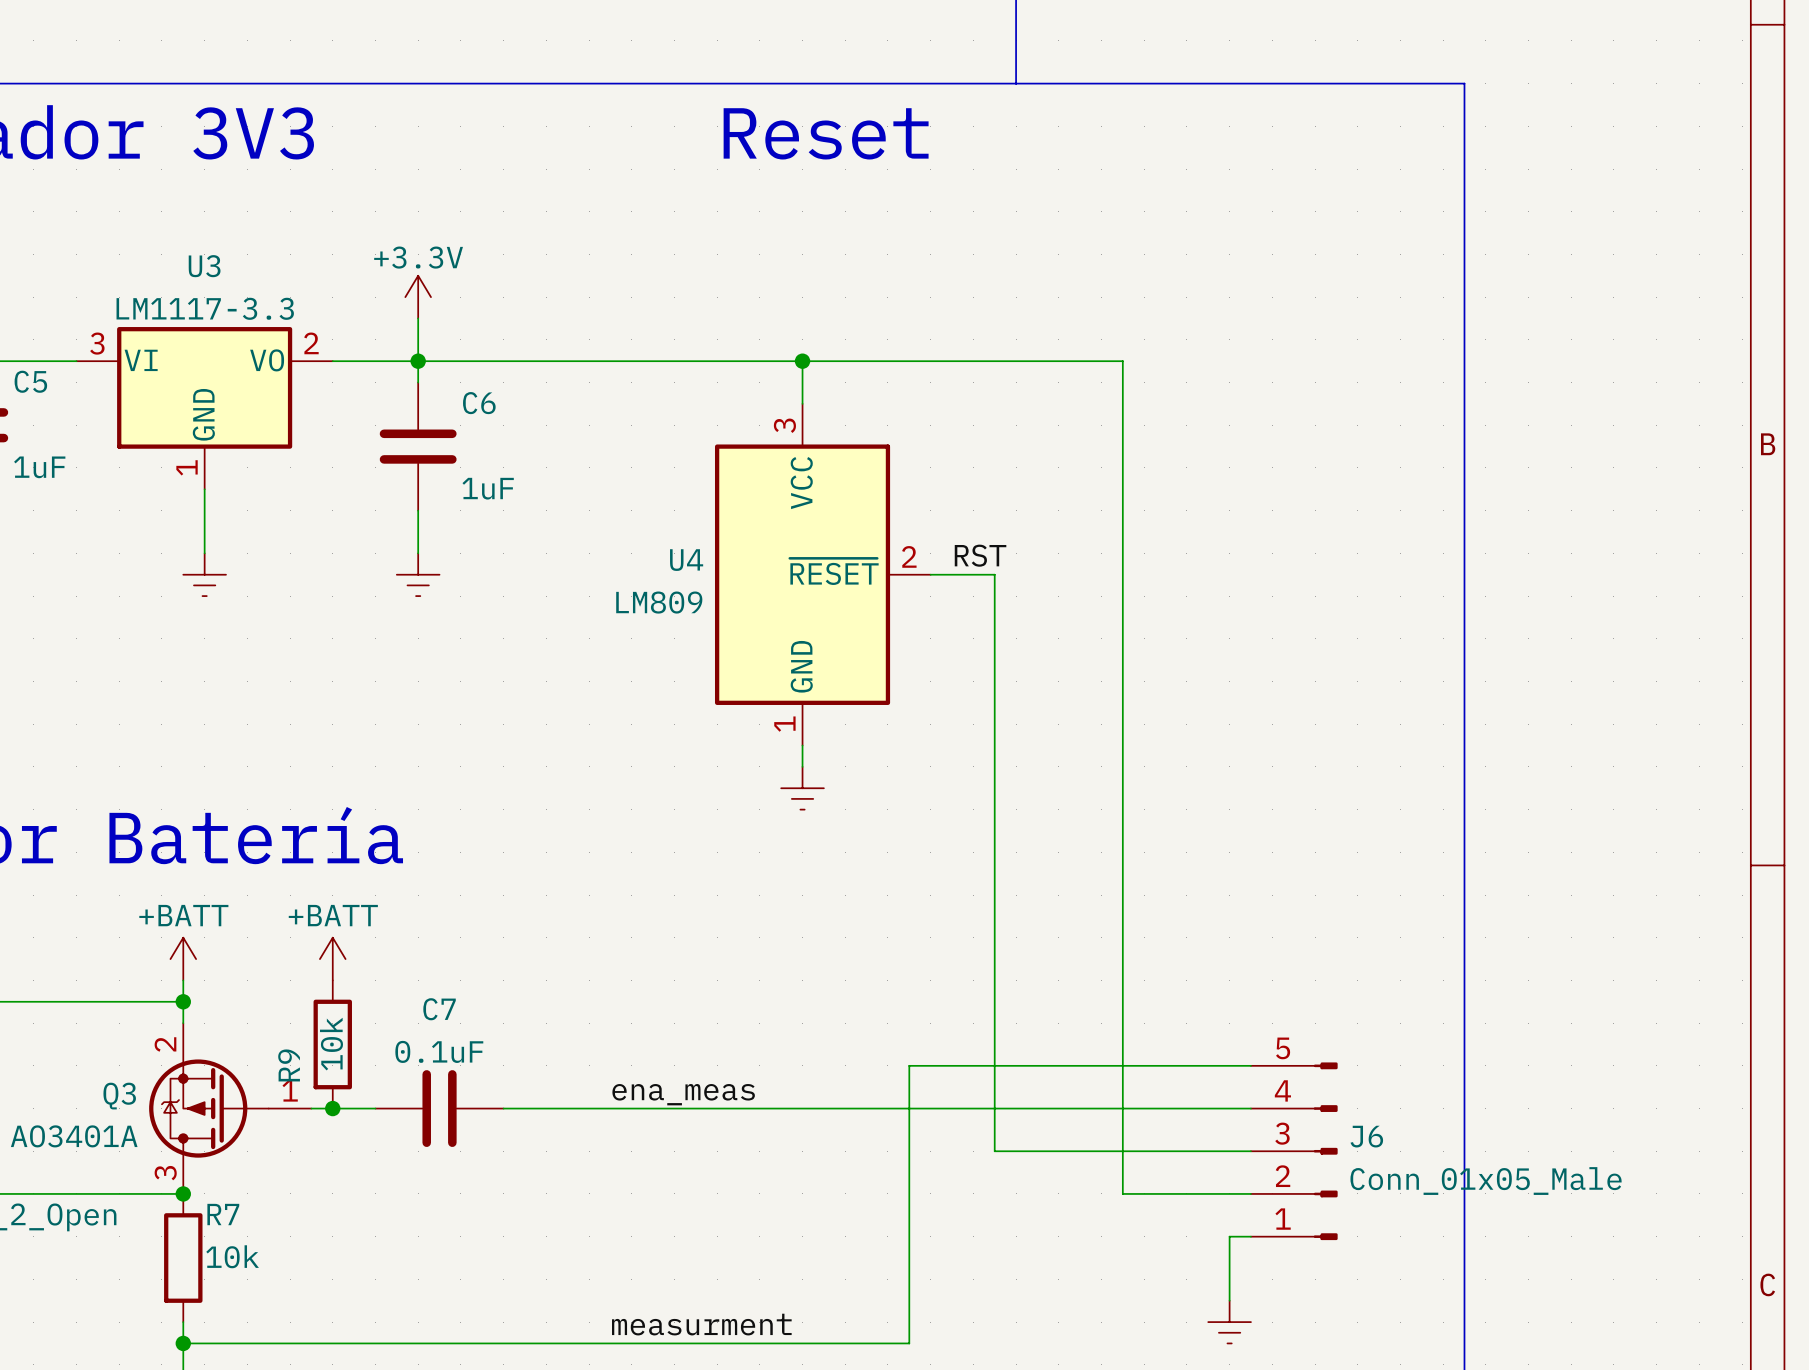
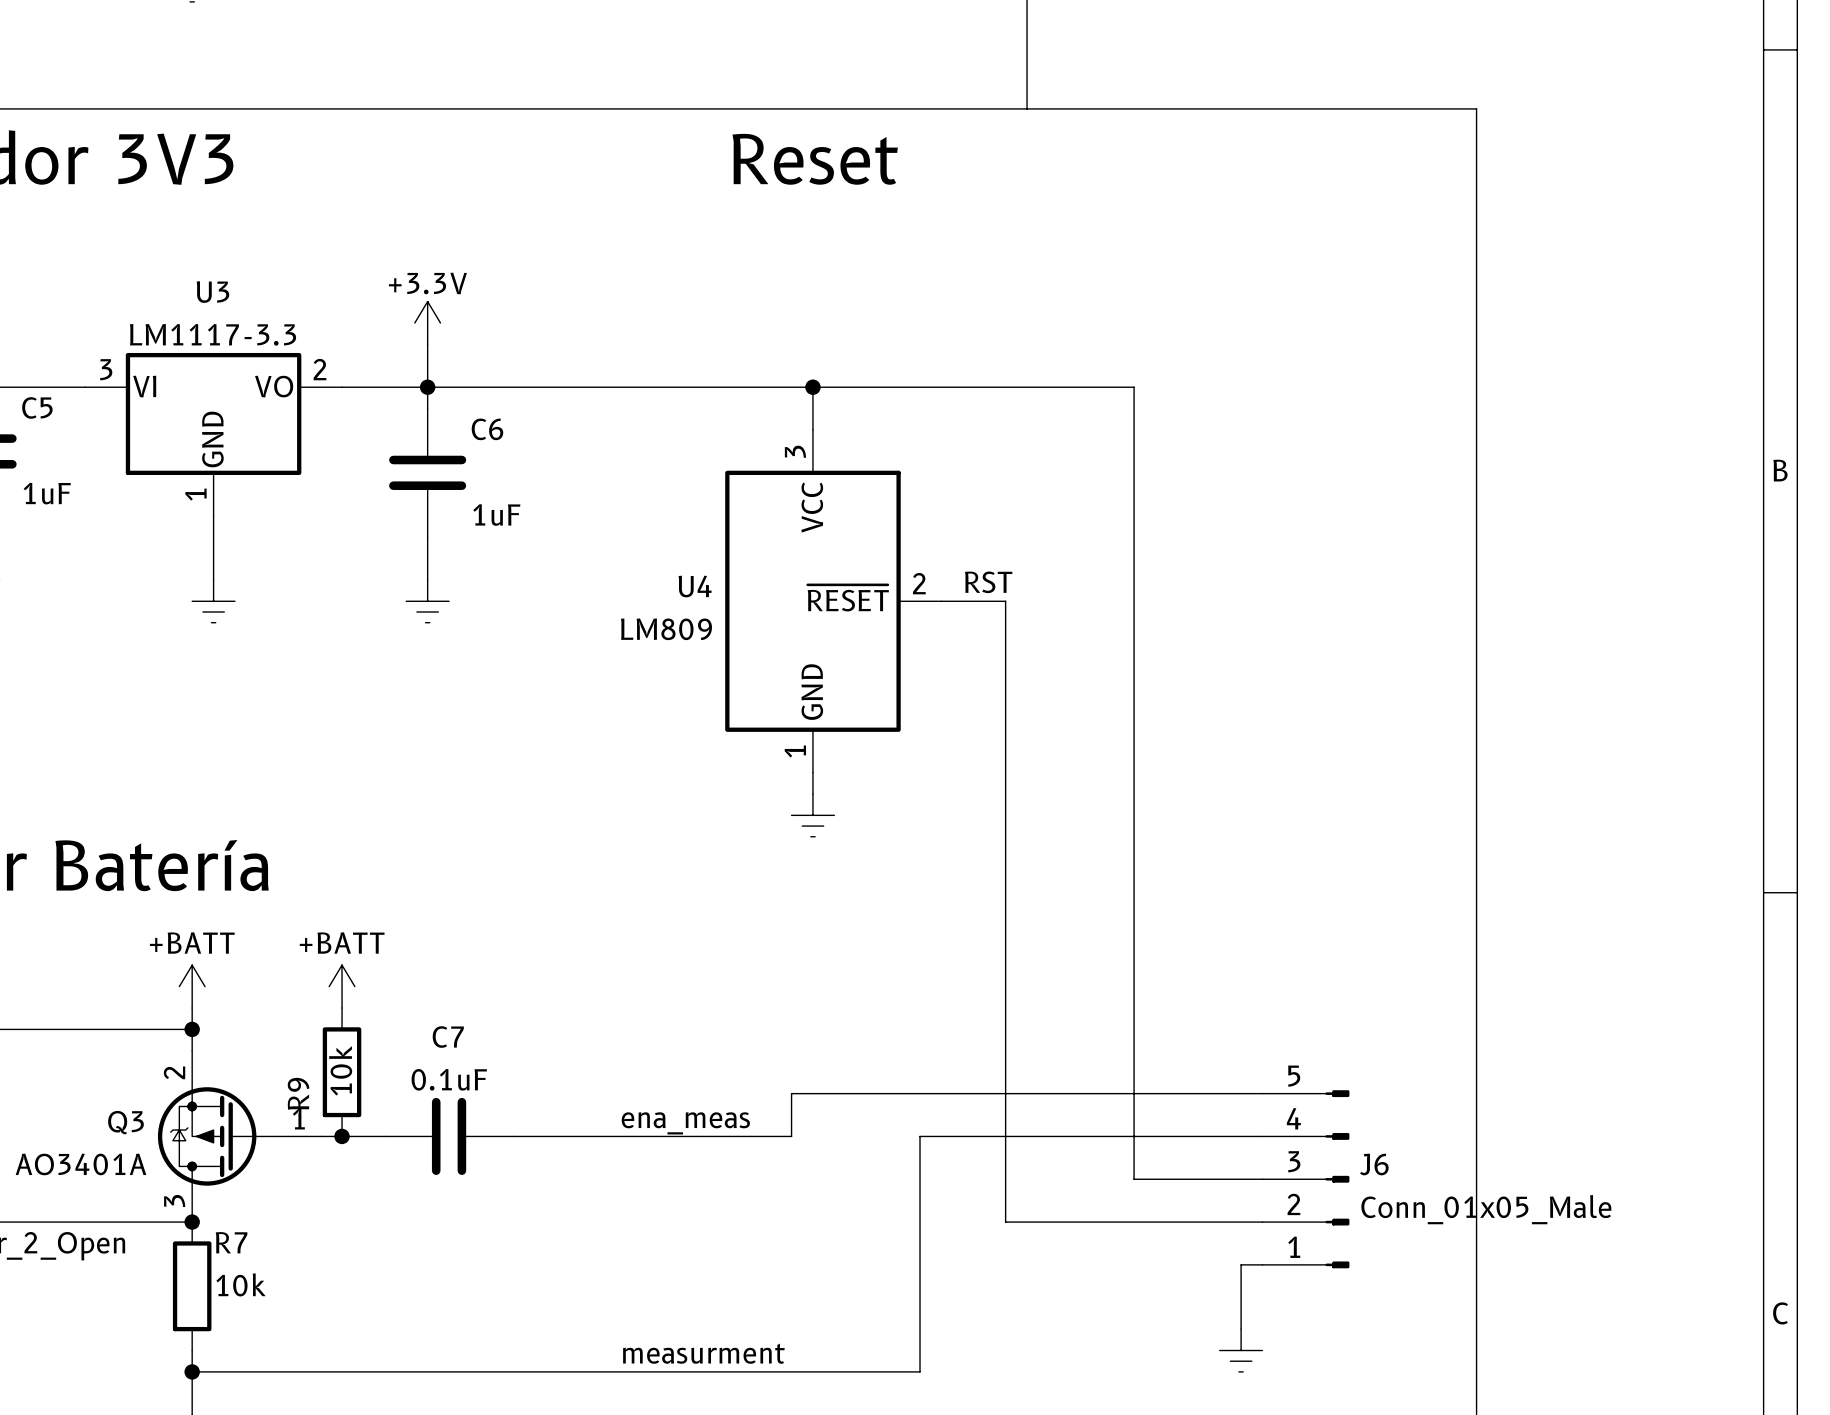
wire: (909, 1065) (909, 1108) (781, 1108) -> (920, 1093) (791, 1093) (791, 1136)
wire: (994, 1151) (1122, 1151) (1122, 1193) -> (1005, 1179) (1005, 1222) (1134, 1222)

